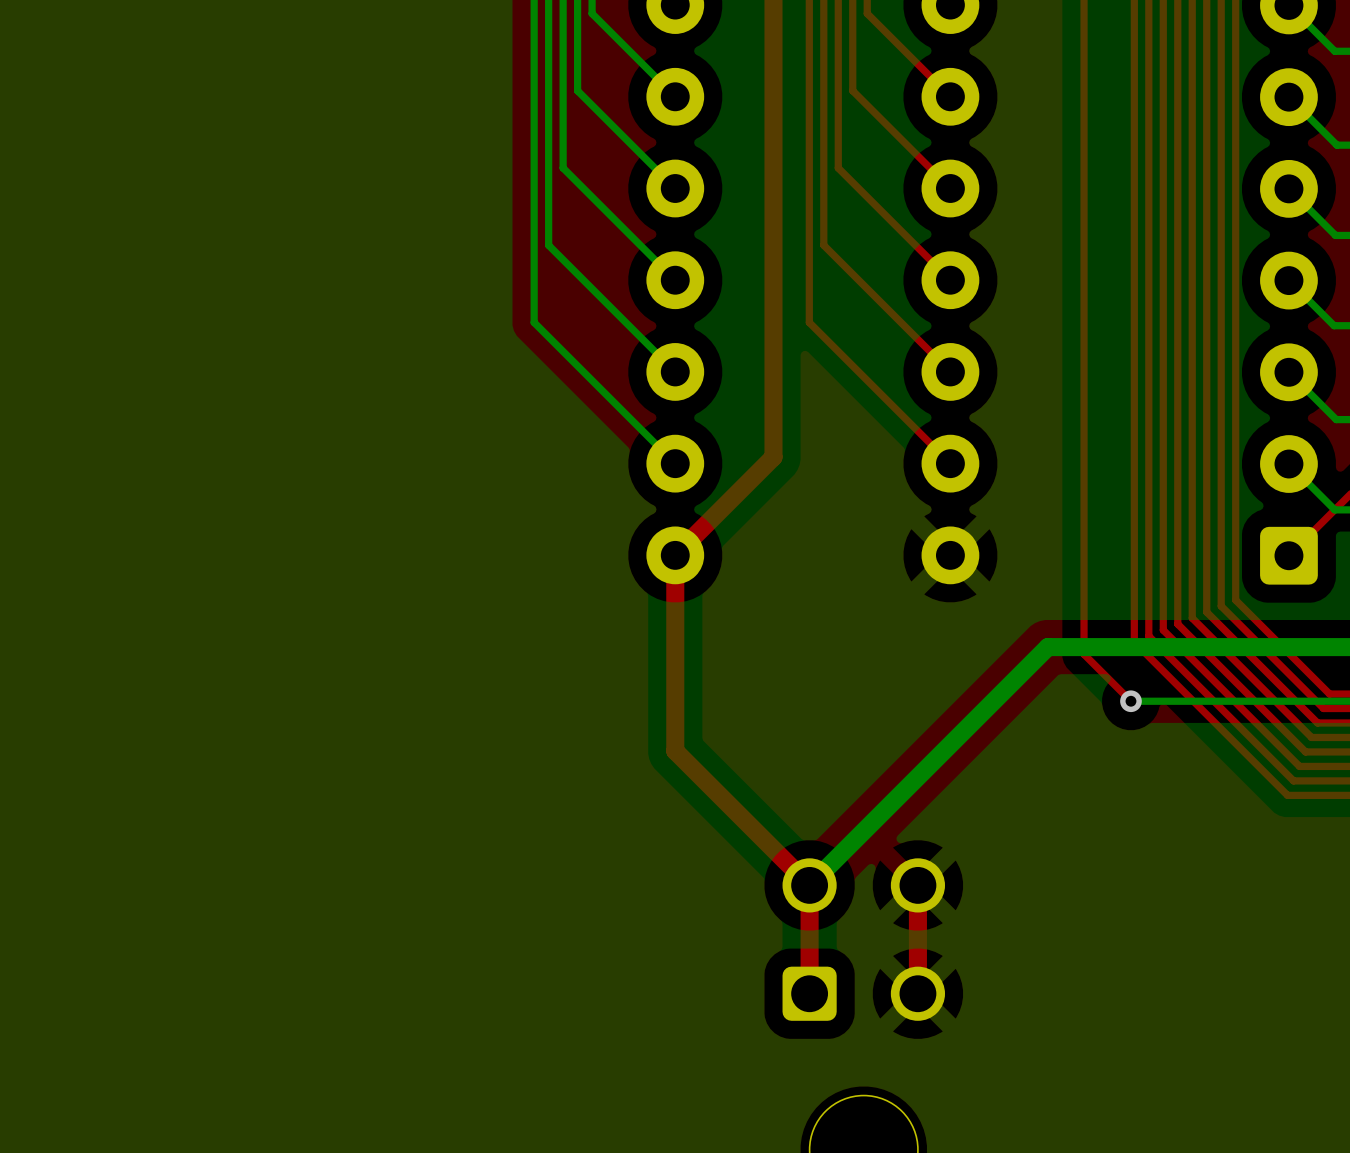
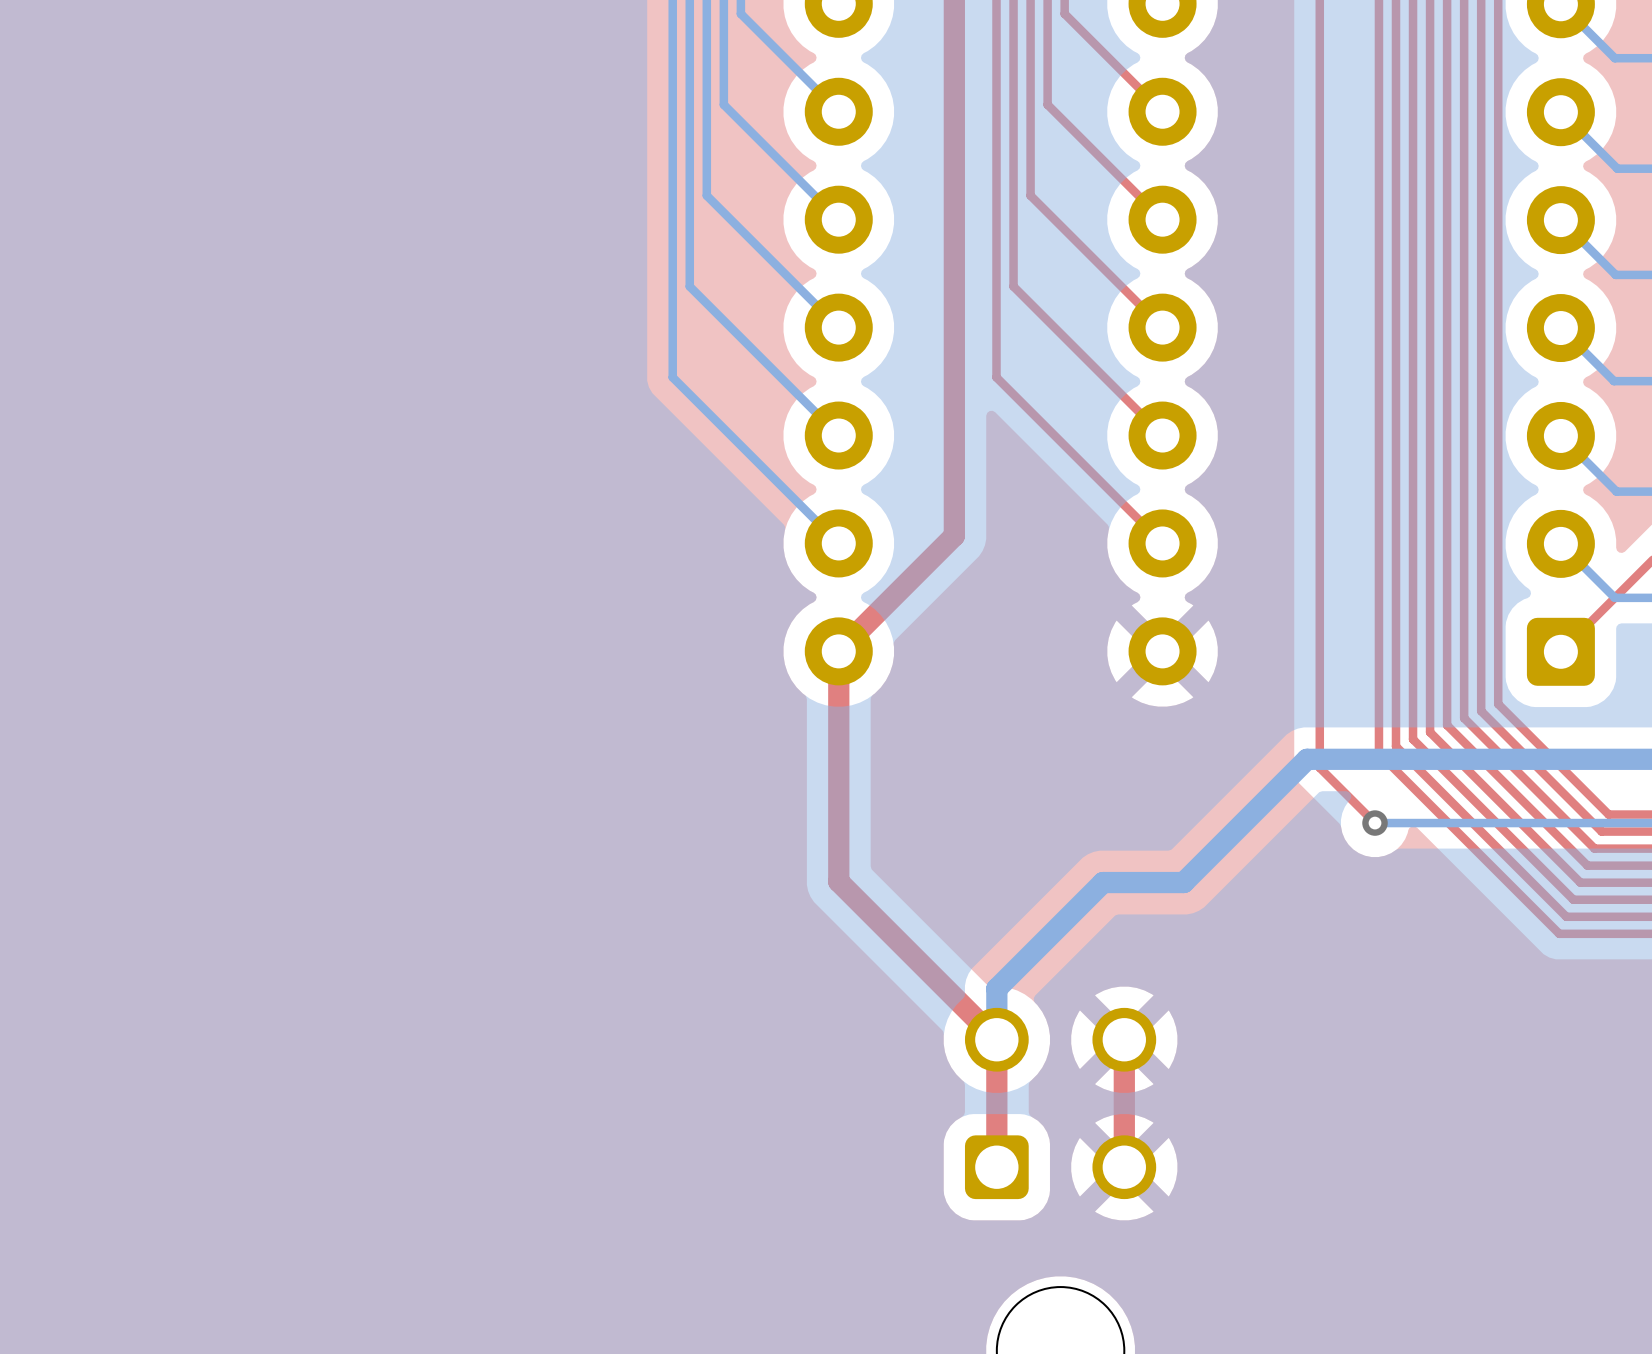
bottom track: (1073, 647) (1047, 647) (809, 885) -> (1307, 759) (1183, 882) (1103, 882) (996, 988) (996, 1039)

